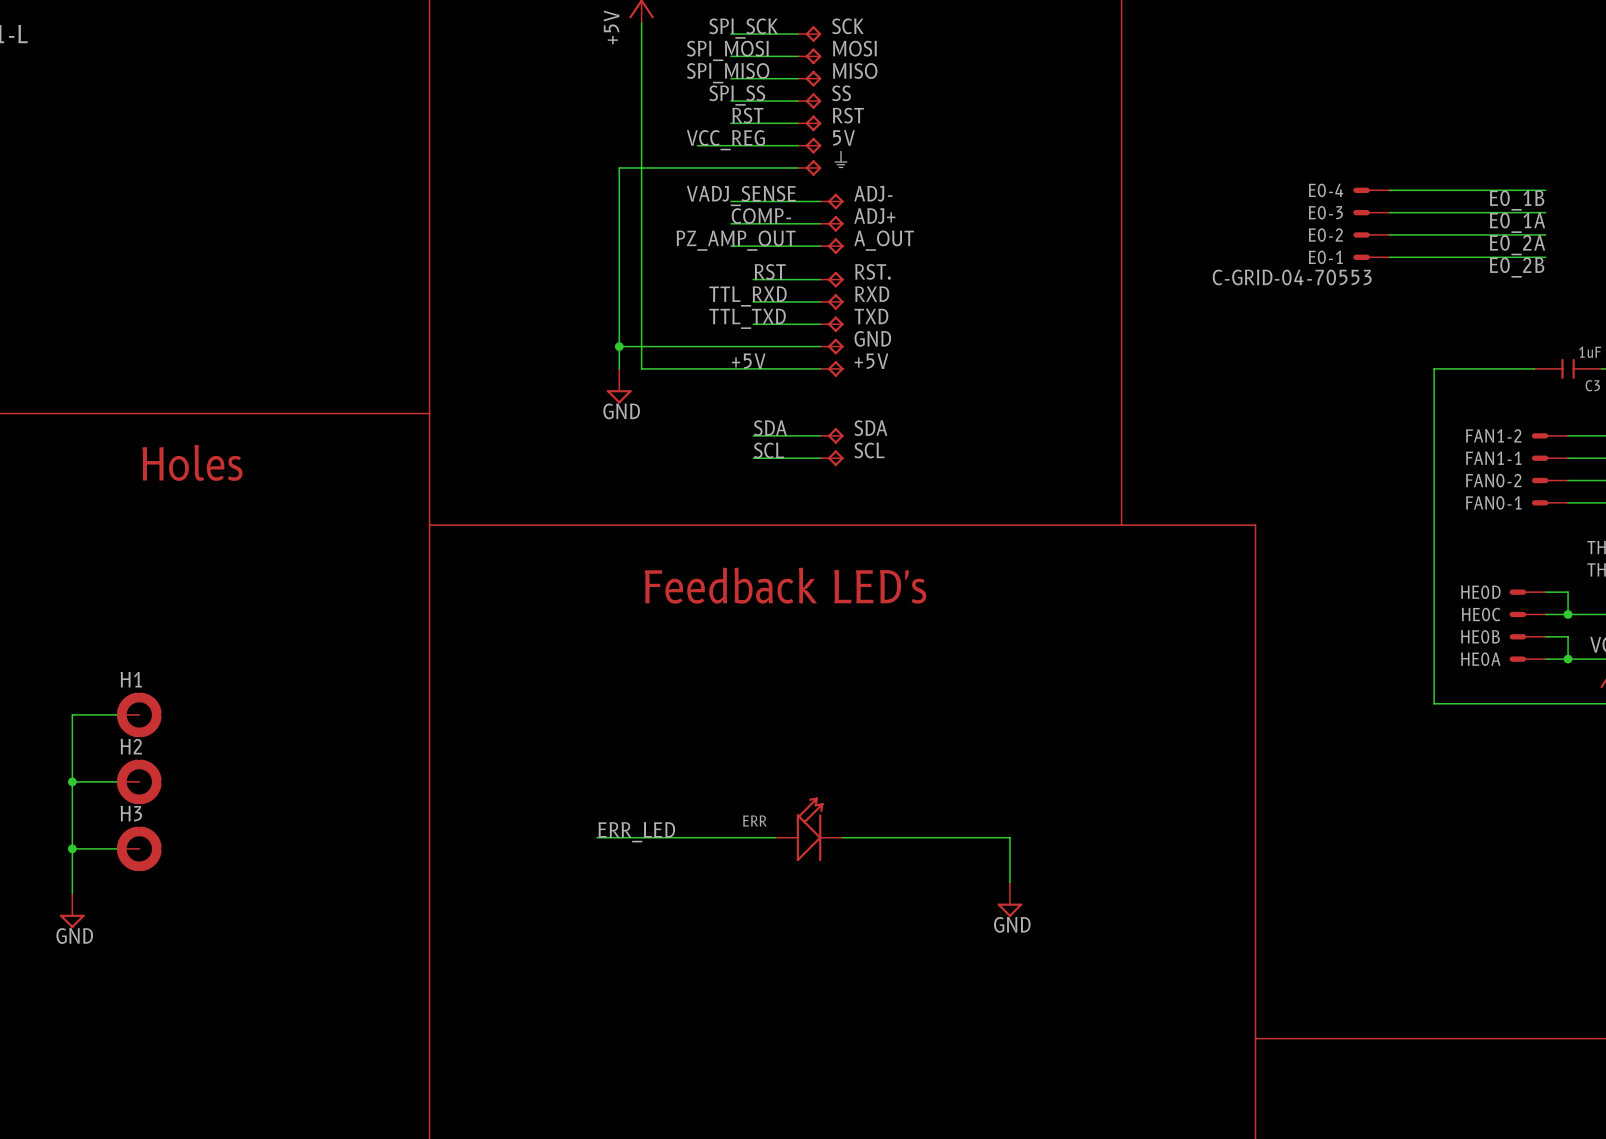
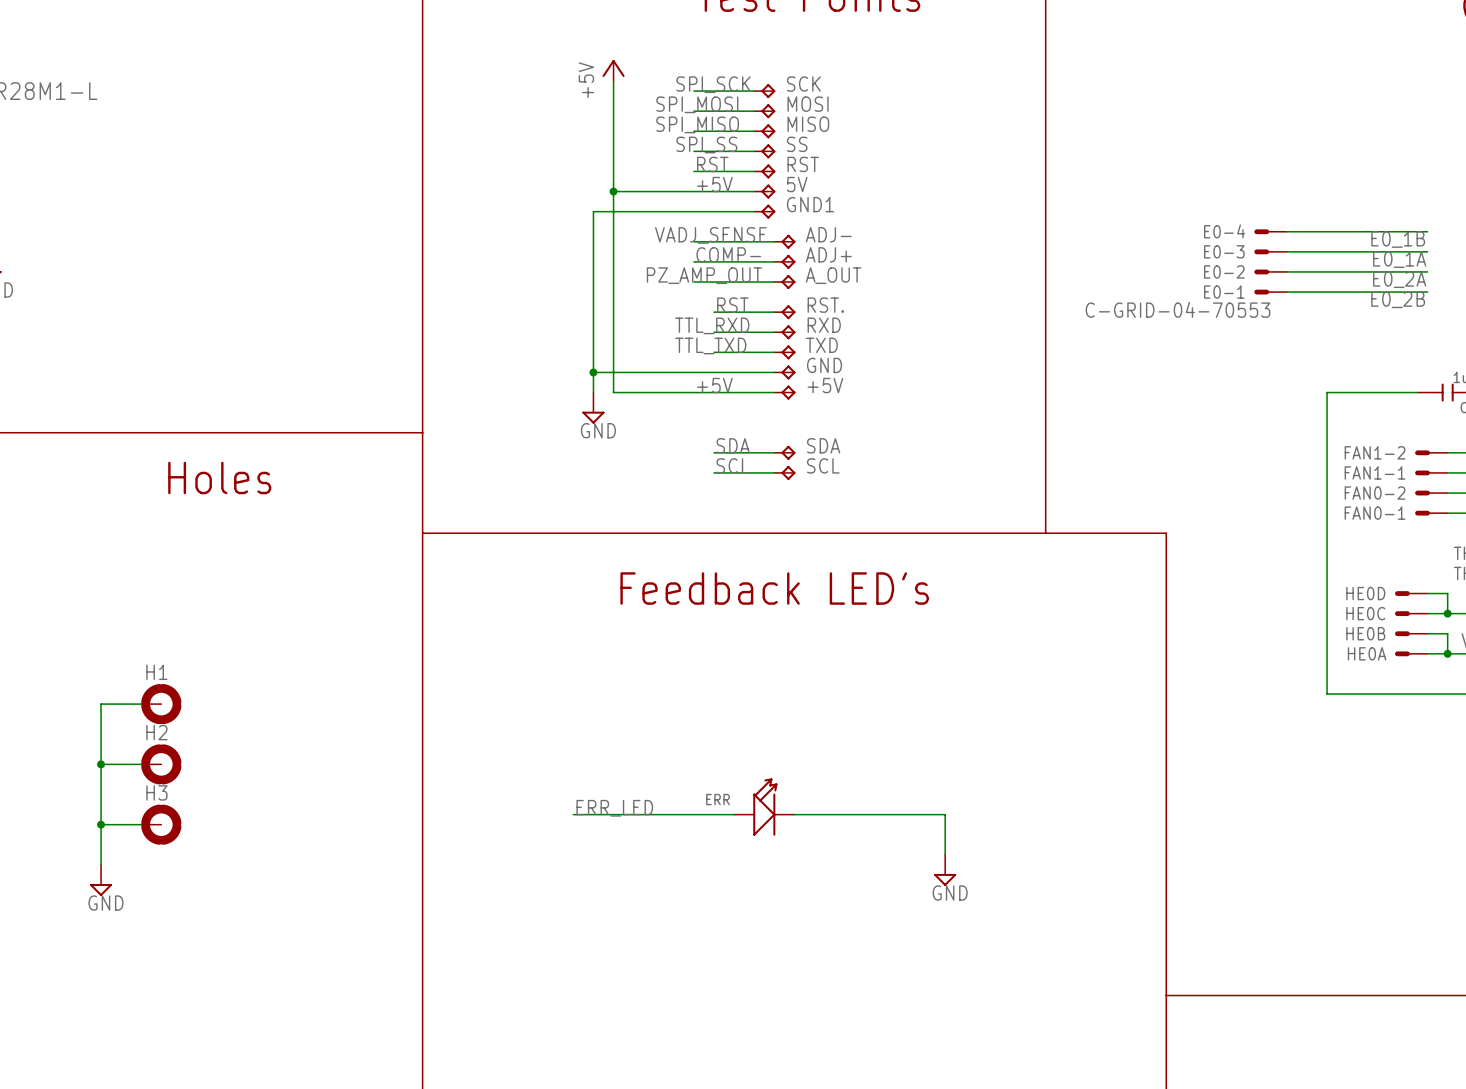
label: none -> +5V (714, 184)
label: VCC_REG (725, 140) -> none
wire: none -> (613, 191) (663, 191)
junction: none -> (613, 191)
GND1 name: ⏚ (840, 159) -> GND1 (810, 204)

